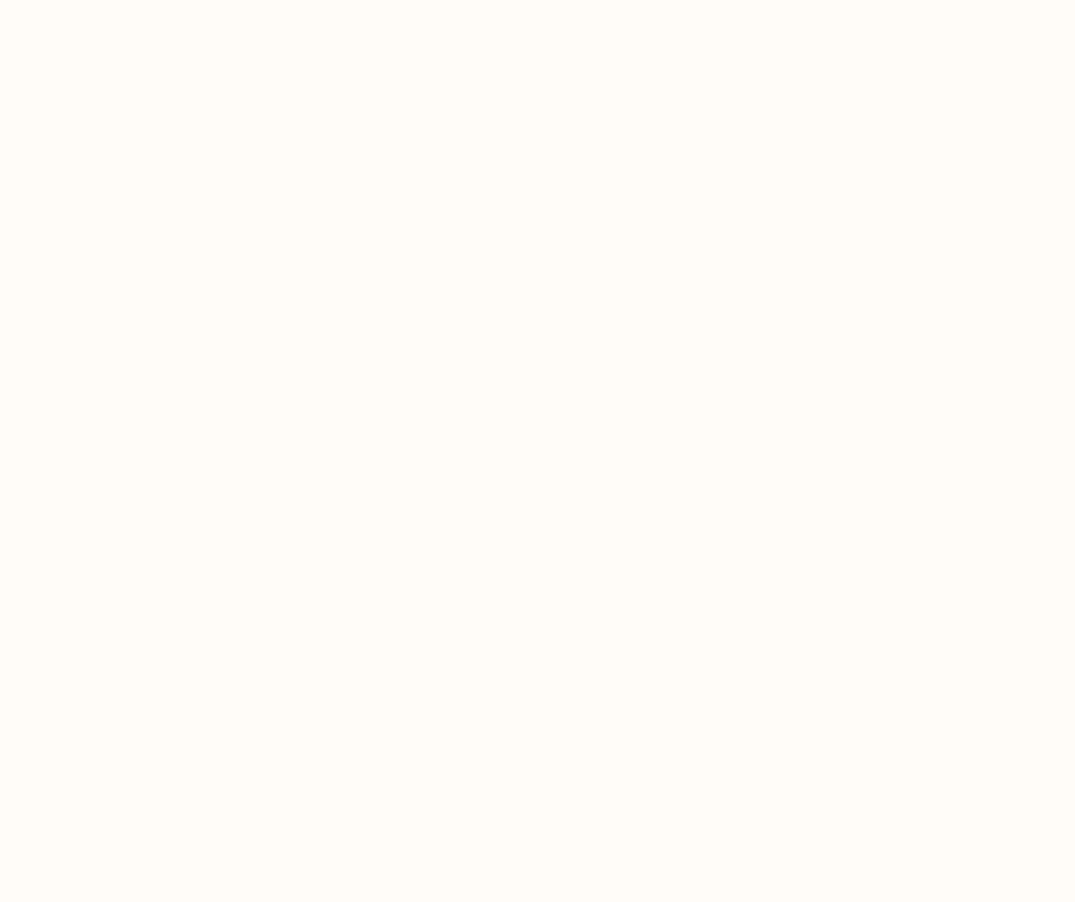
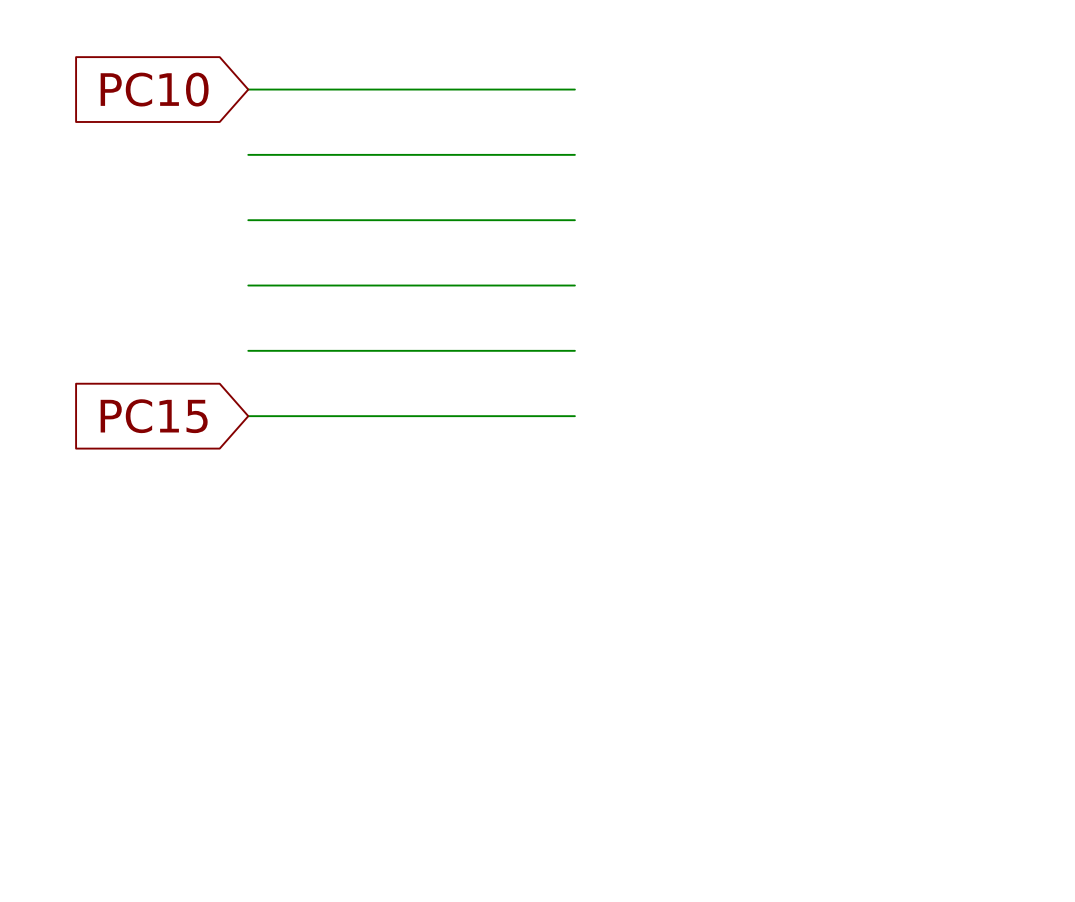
global label: none -> PC10 (154, 89)
wire: none -> (248, 89) (574, 89)
wire: none -> (248, 154) (574, 154)
wire: none -> (248, 220) (574, 220)
wire: none -> (248, 285) (574, 285)
wire: none -> (248, 350) (574, 350)
global label: none -> PC15 (154, 416)
wire: none -> (248, 416) (574, 416)

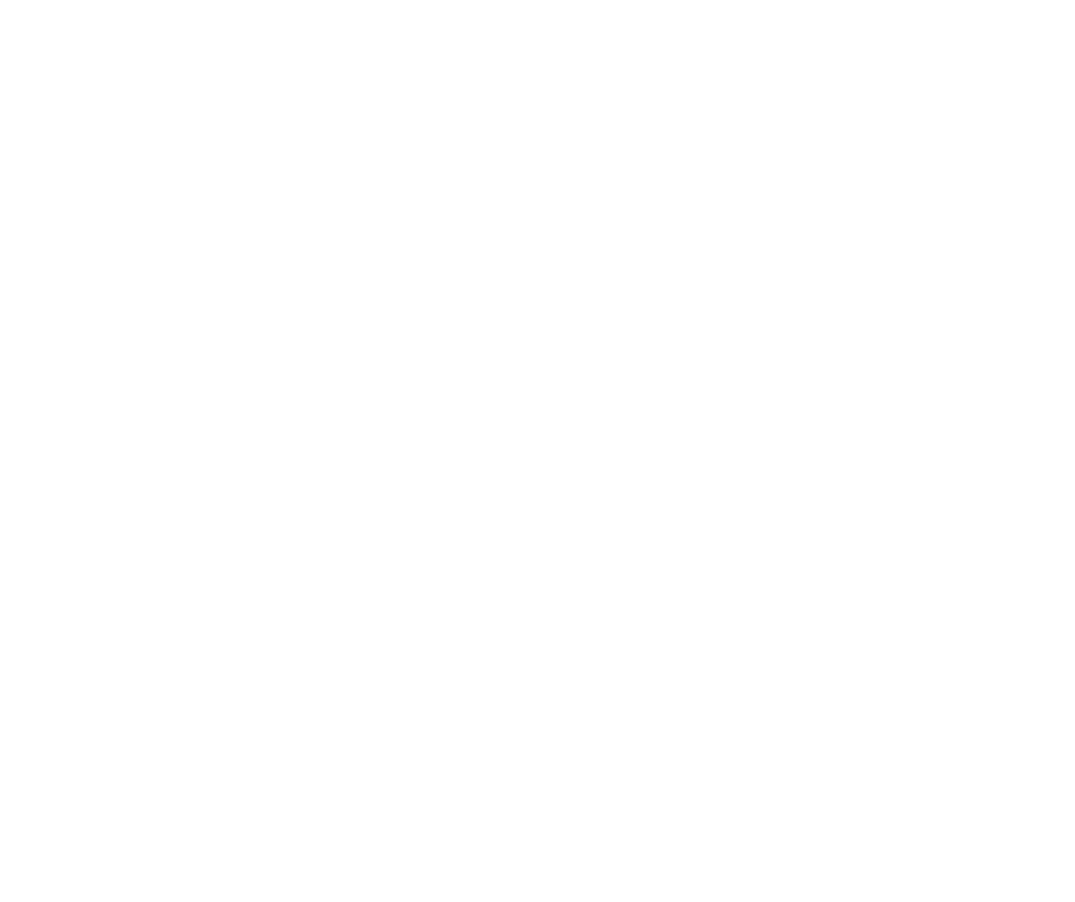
global label: PC10 (154, 89) -> none
wire: (248, 89) (574, 89) -> none
wire: (248, 154) (574, 154) -> none
wire: (248, 220) (574, 220) -> none
wire: (248, 285) (574, 285) -> none
wire: (248, 350) (574, 350) -> none
global label: PC15 (154, 416) -> none
wire: (248, 416) (574, 416) -> none

